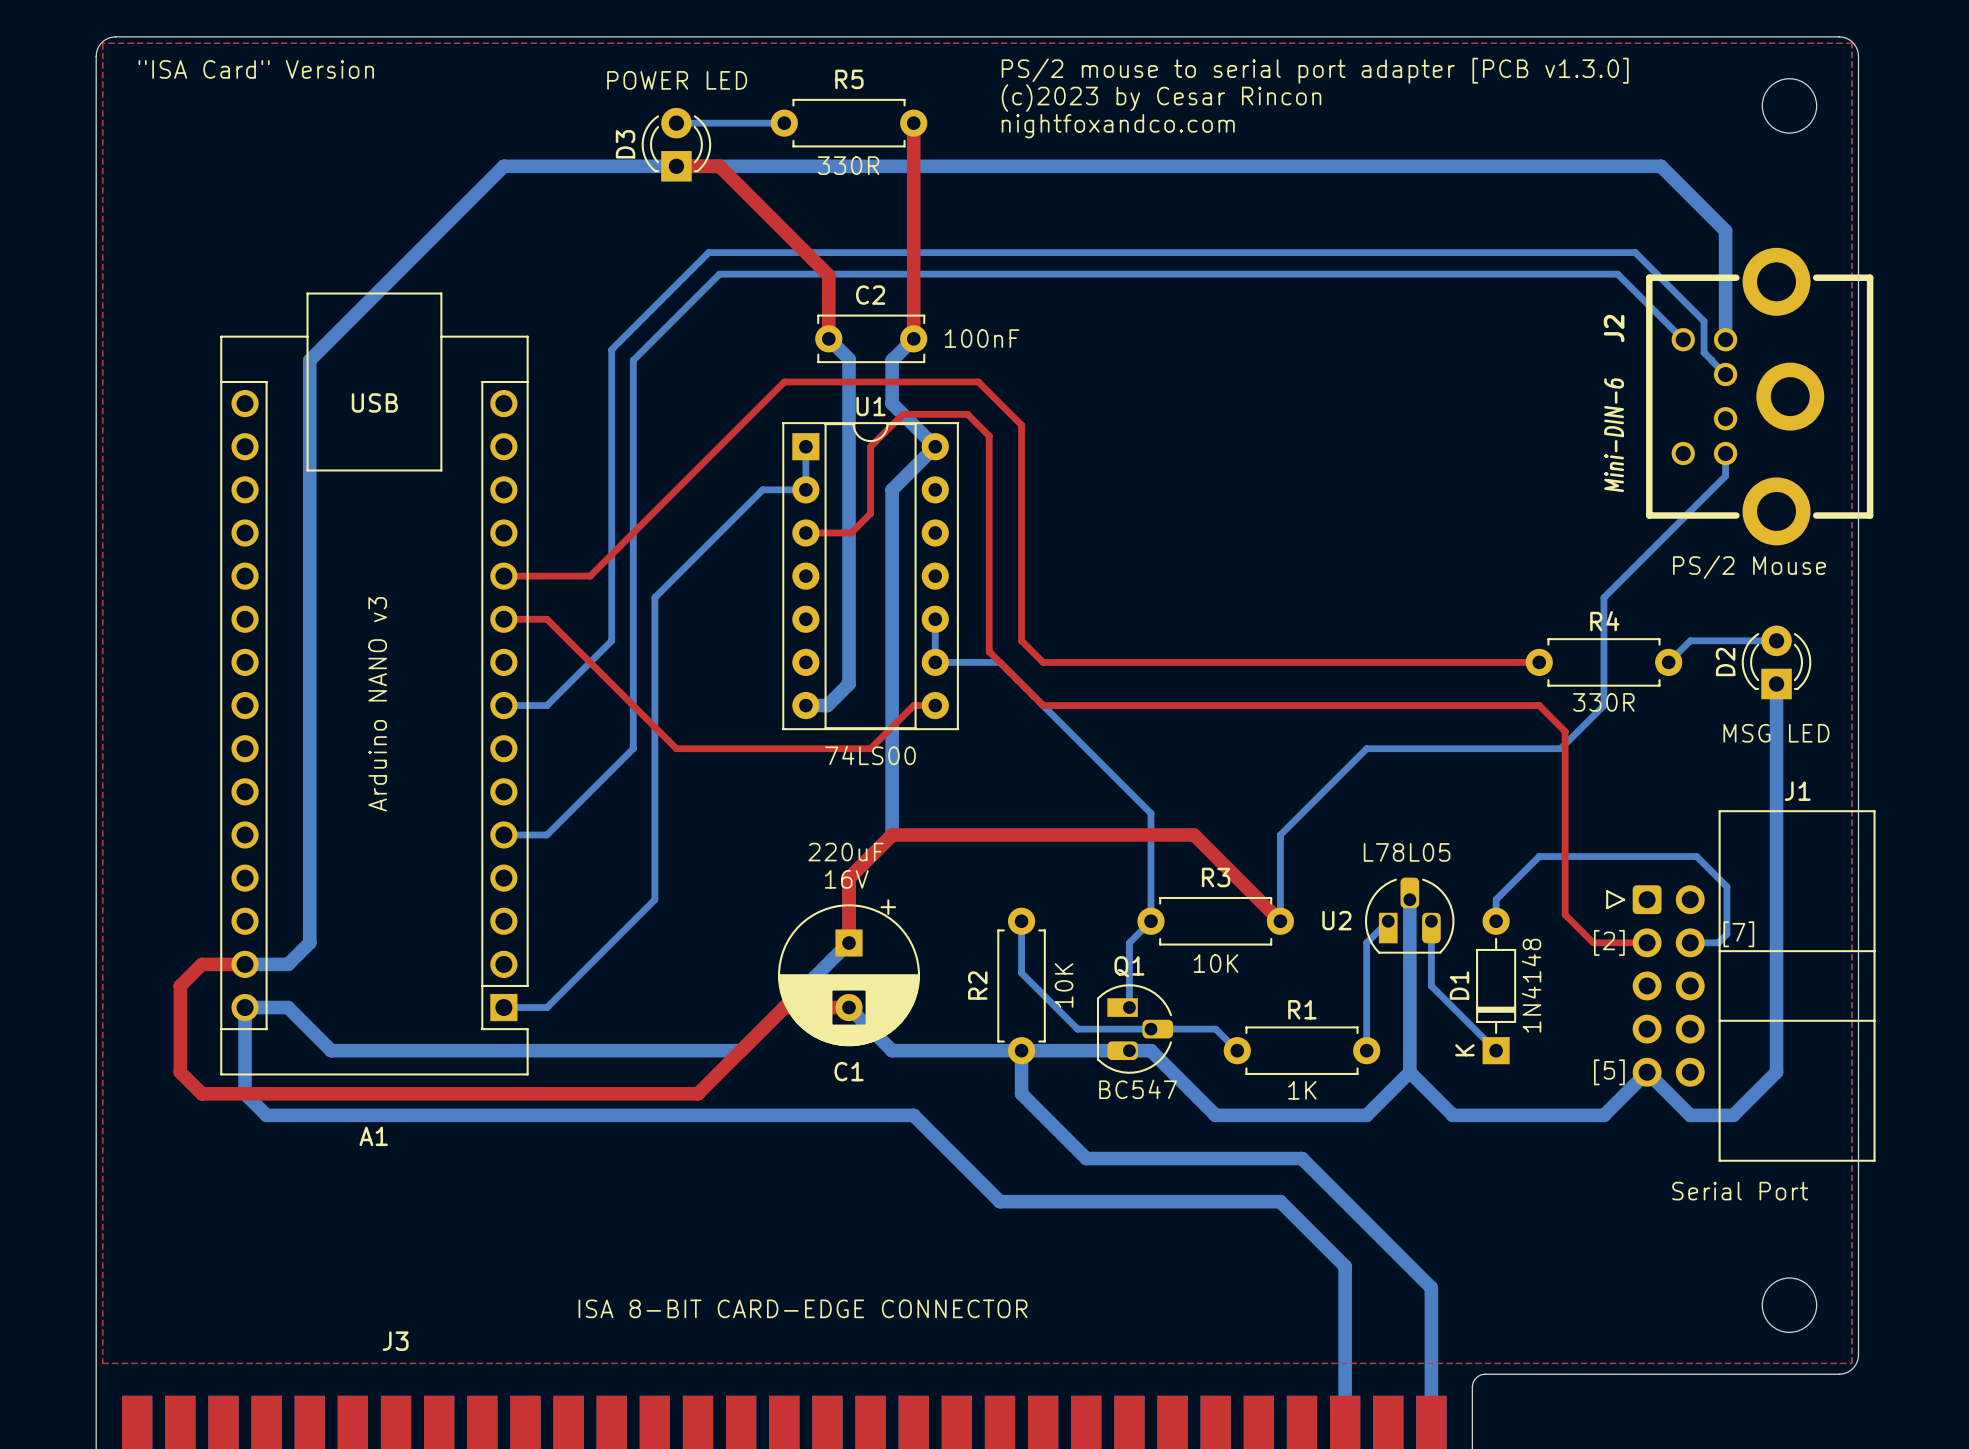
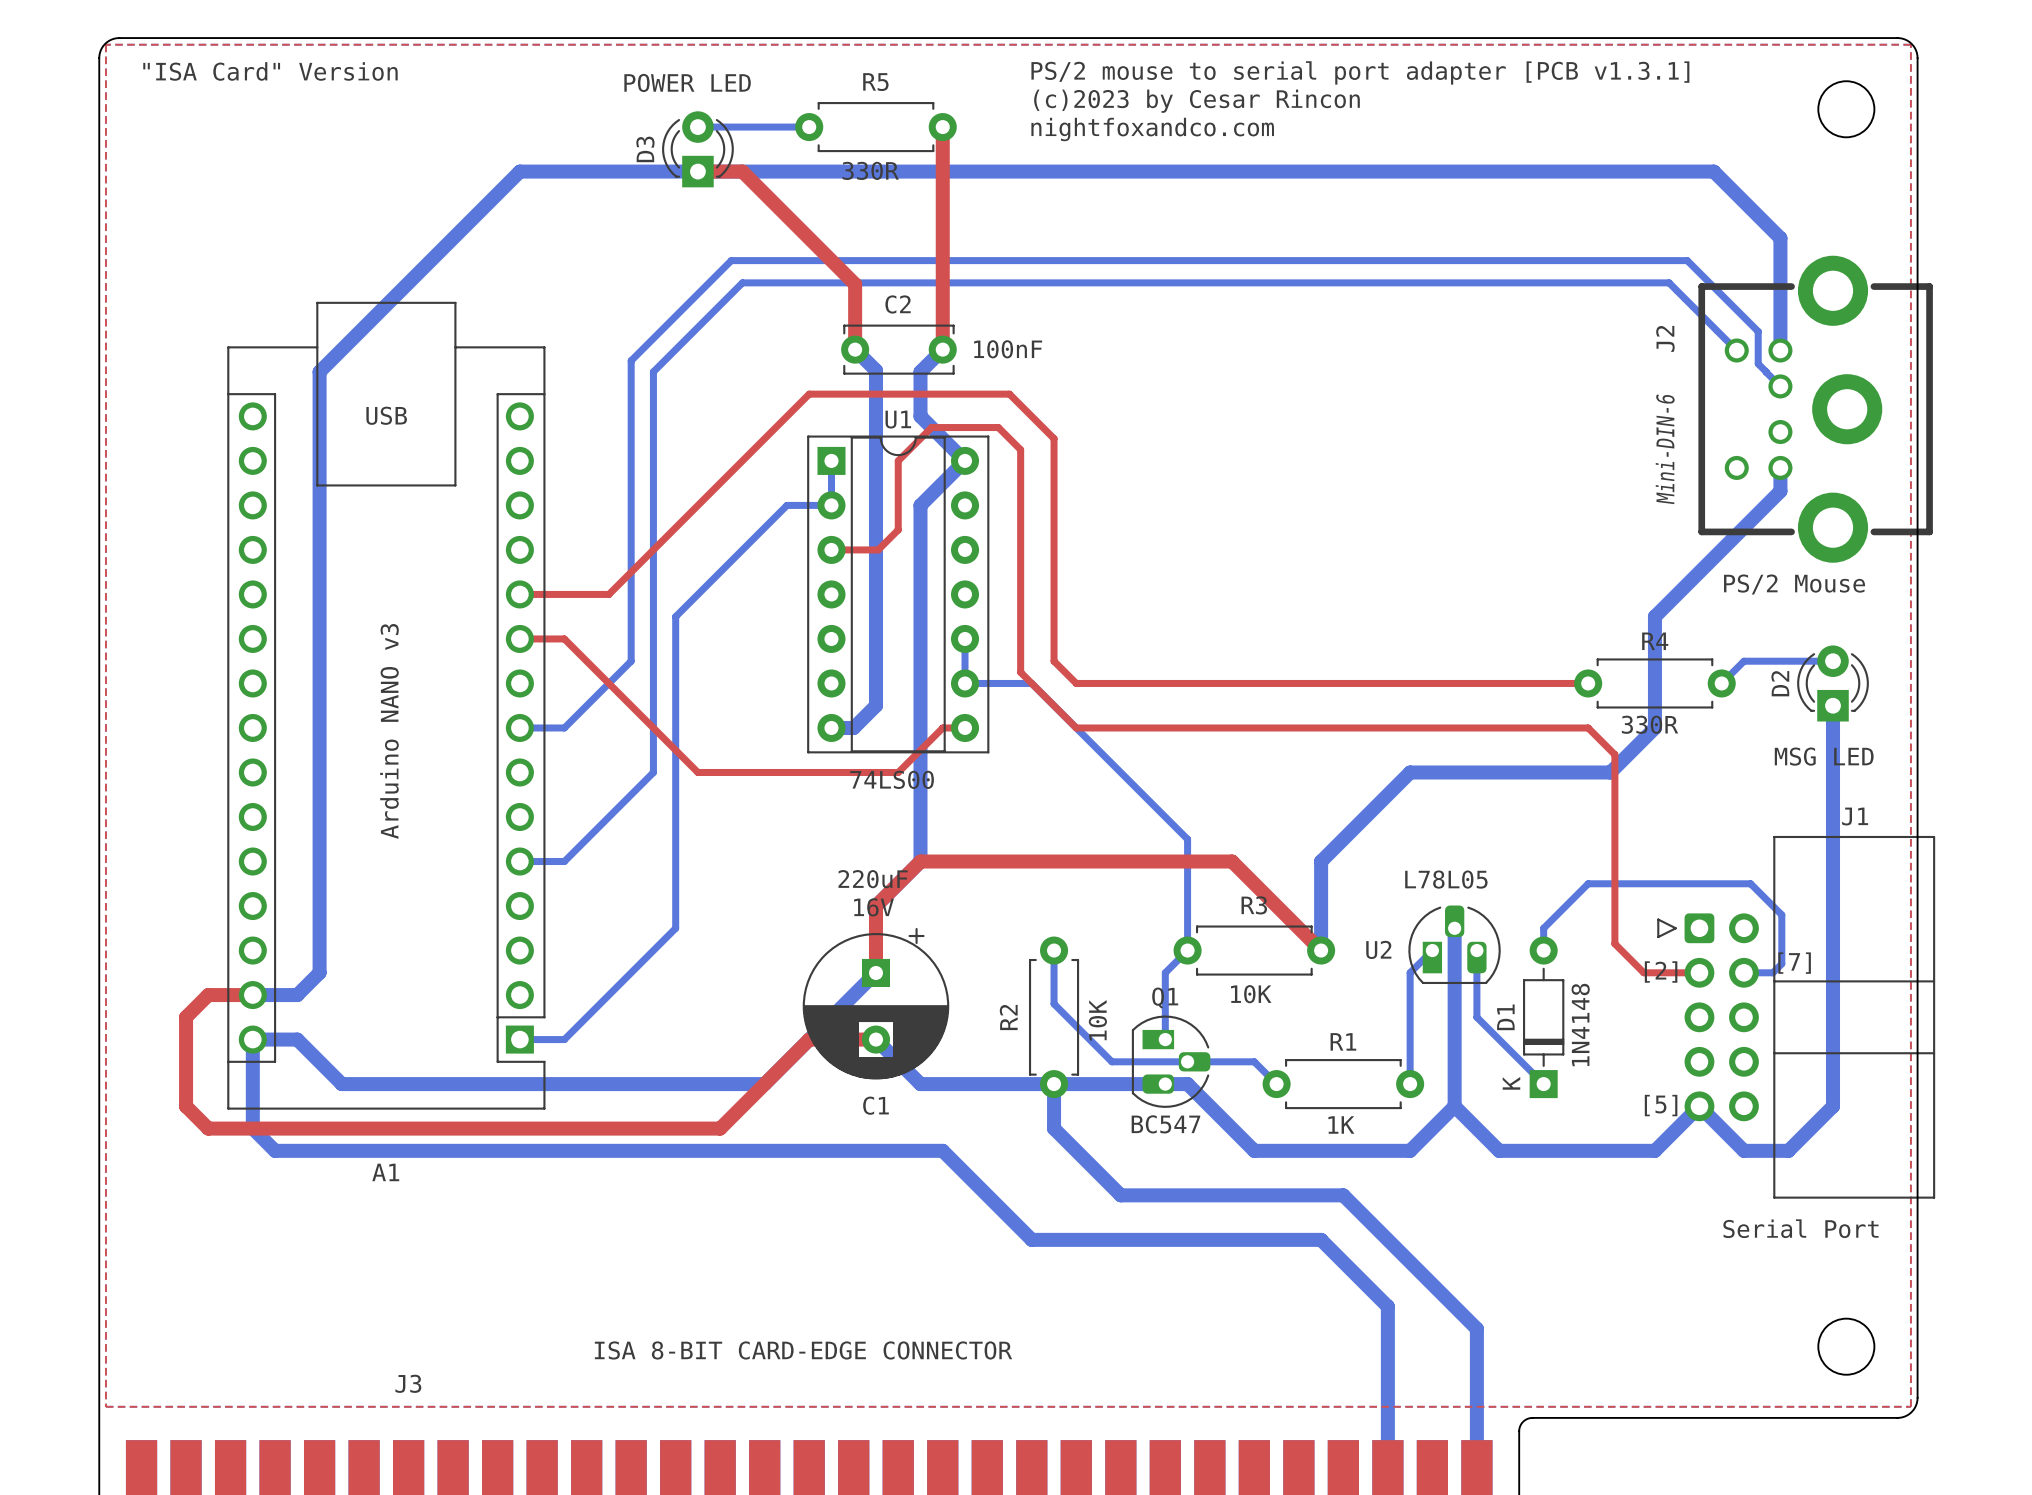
text: PS/2 mouse to serial port adapter [PCB v1.3.0] (1315, 70) -> PS/2 mouse to serial port adapter [PCB v1.3.1] (1360, 72)
bottom track width: thin (1725, 453) (1725, 476) (1603, 597) (1603, 705) (1560, 748) (1366, 748) (1280, 834) (1280, 921) -> thick (1780, 467) (1780, 491) (1654, 616) (1654, 727) (1610, 772) (1410, 772) (1321, 861) (1321, 950)

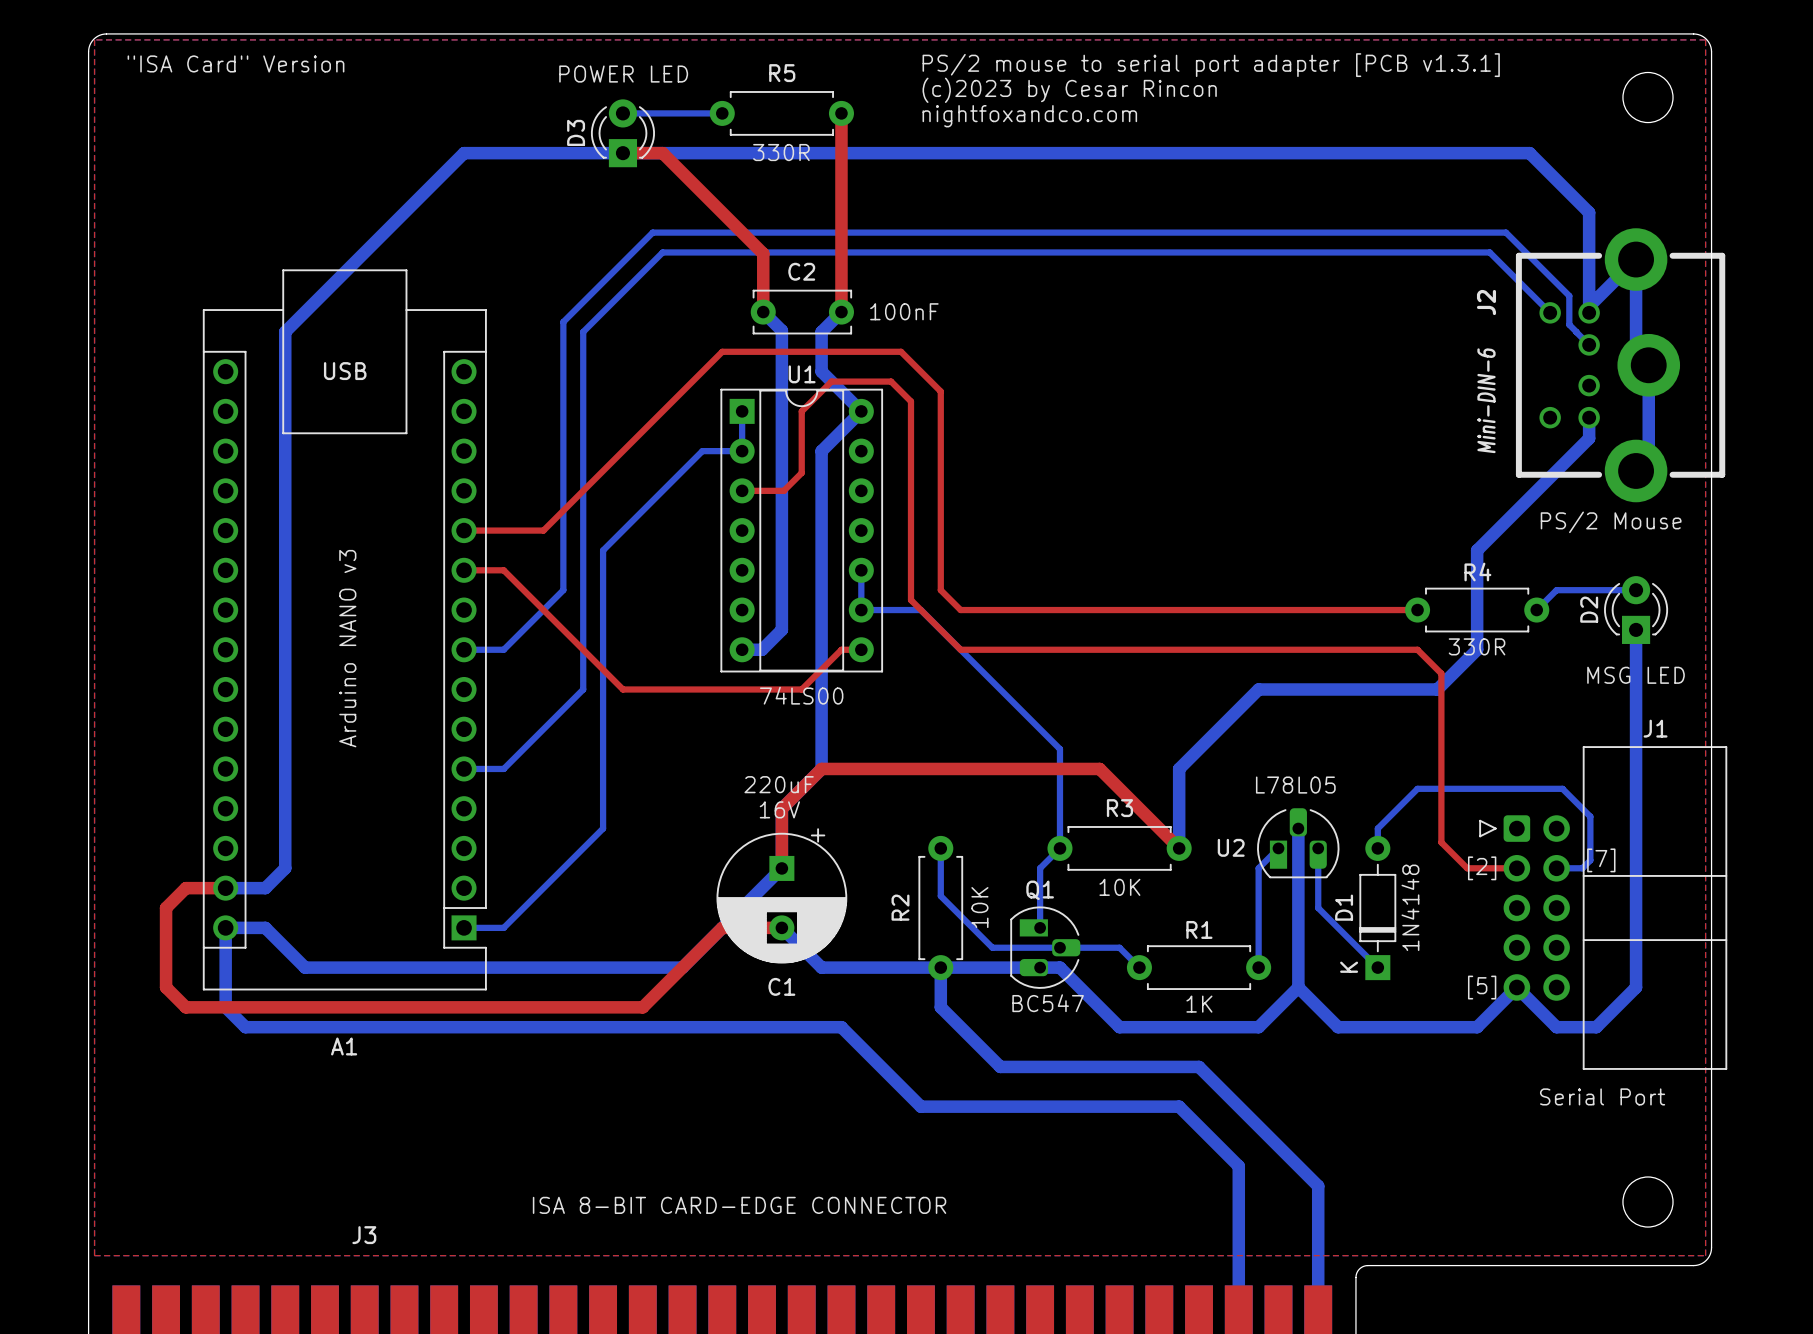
bottom track: none -> (1589, 306) (1636, 259) (1636, 352)
bottom track: none -> (1648, 365) (1648, 458)

